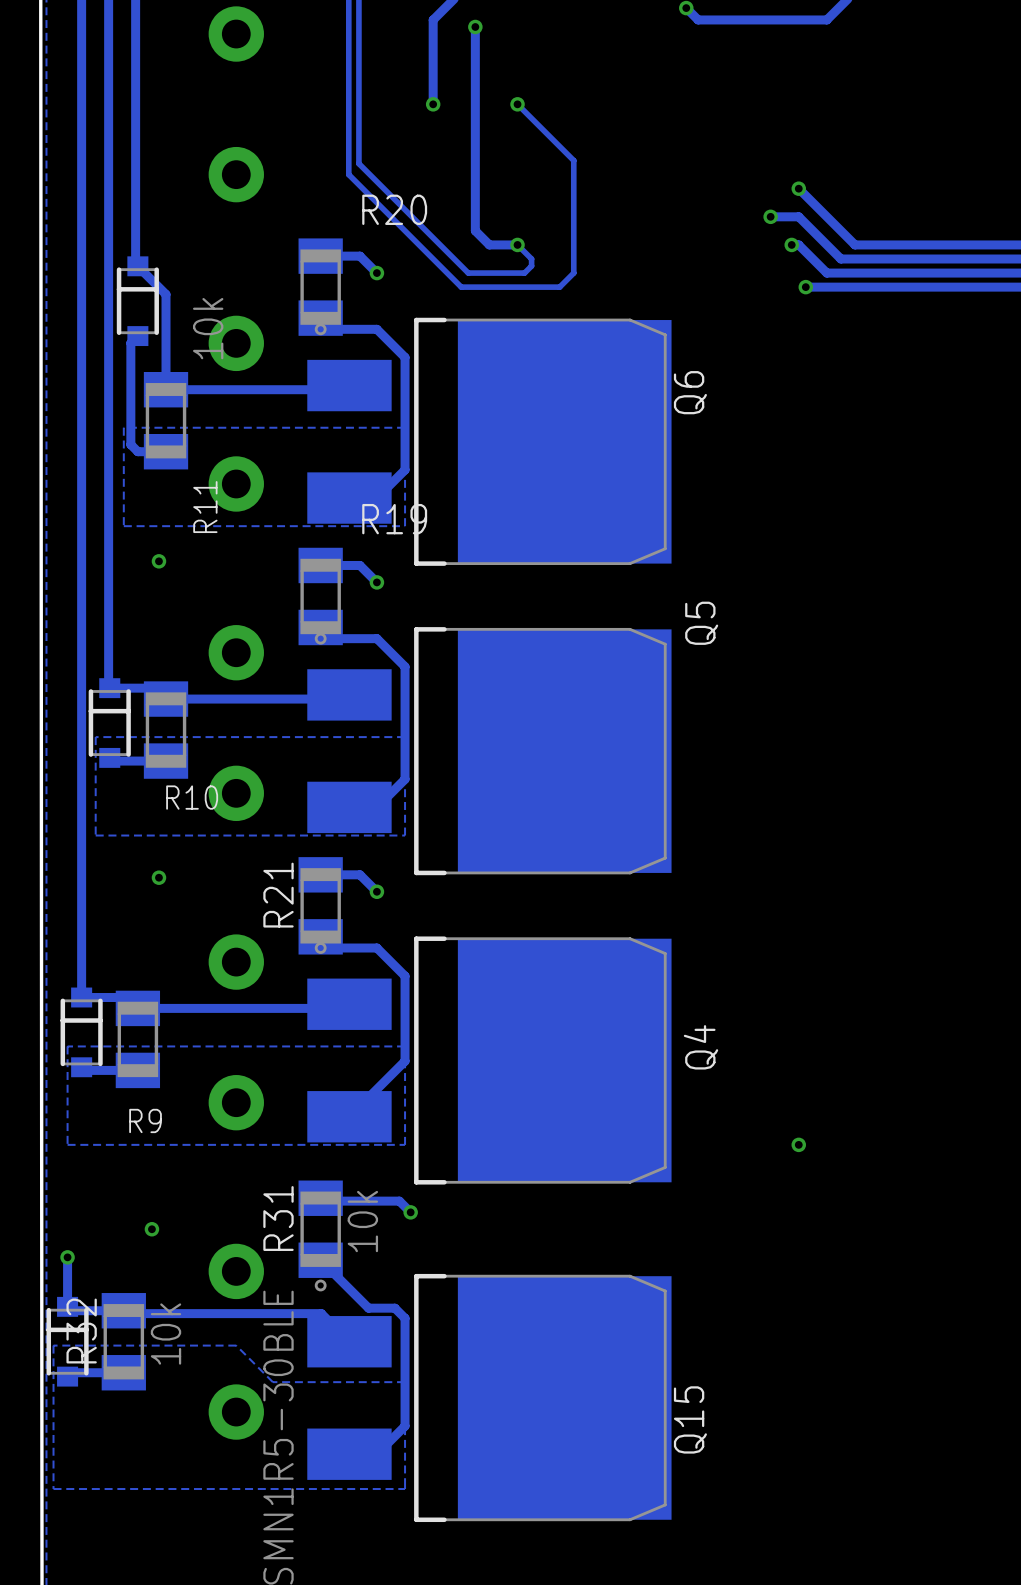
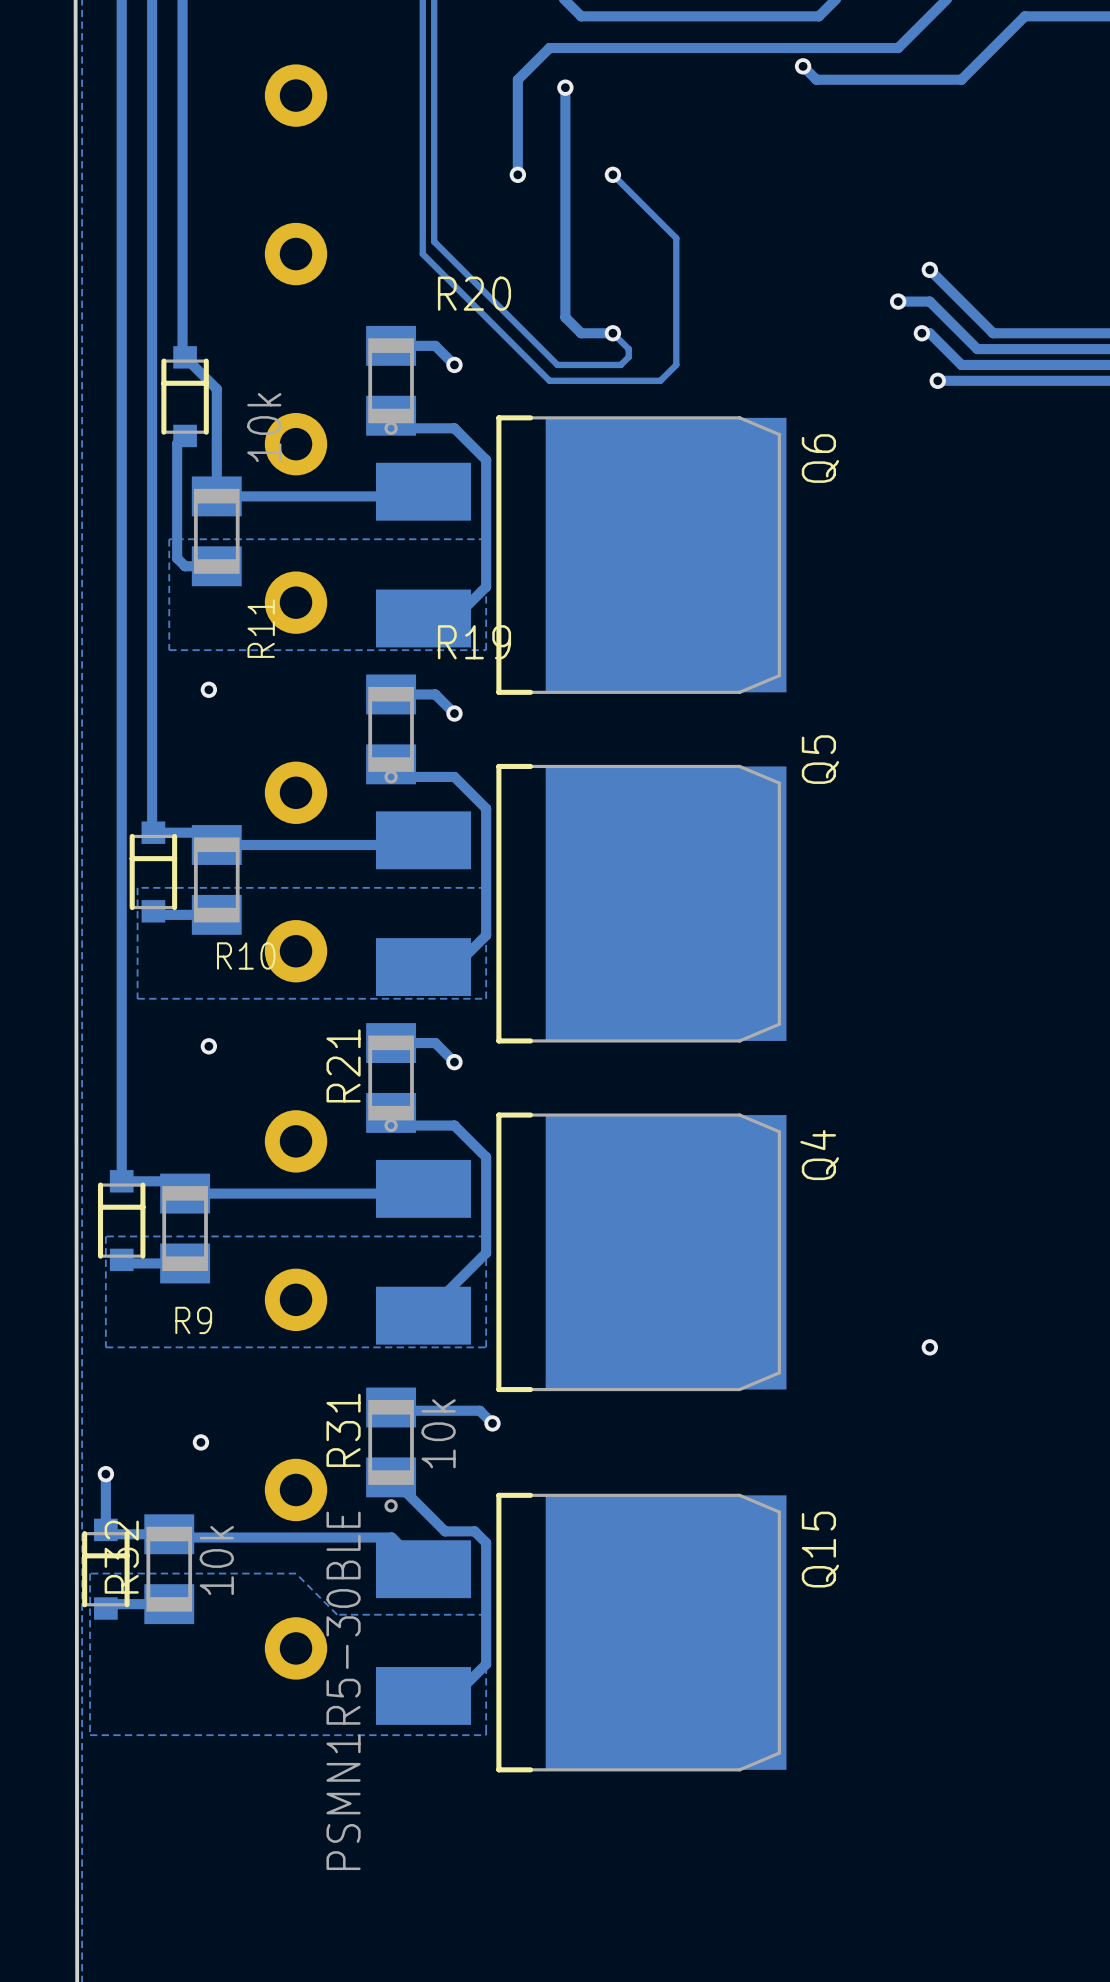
Q6 name position: Q6 (690, 392) -> Q6 (820, 458)
Q4 name position: Q4 (701, 1047) -> Q4 (819, 1155)
Q15 name position: Q15 (690, 1419) -> Q15 (820, 1549)

